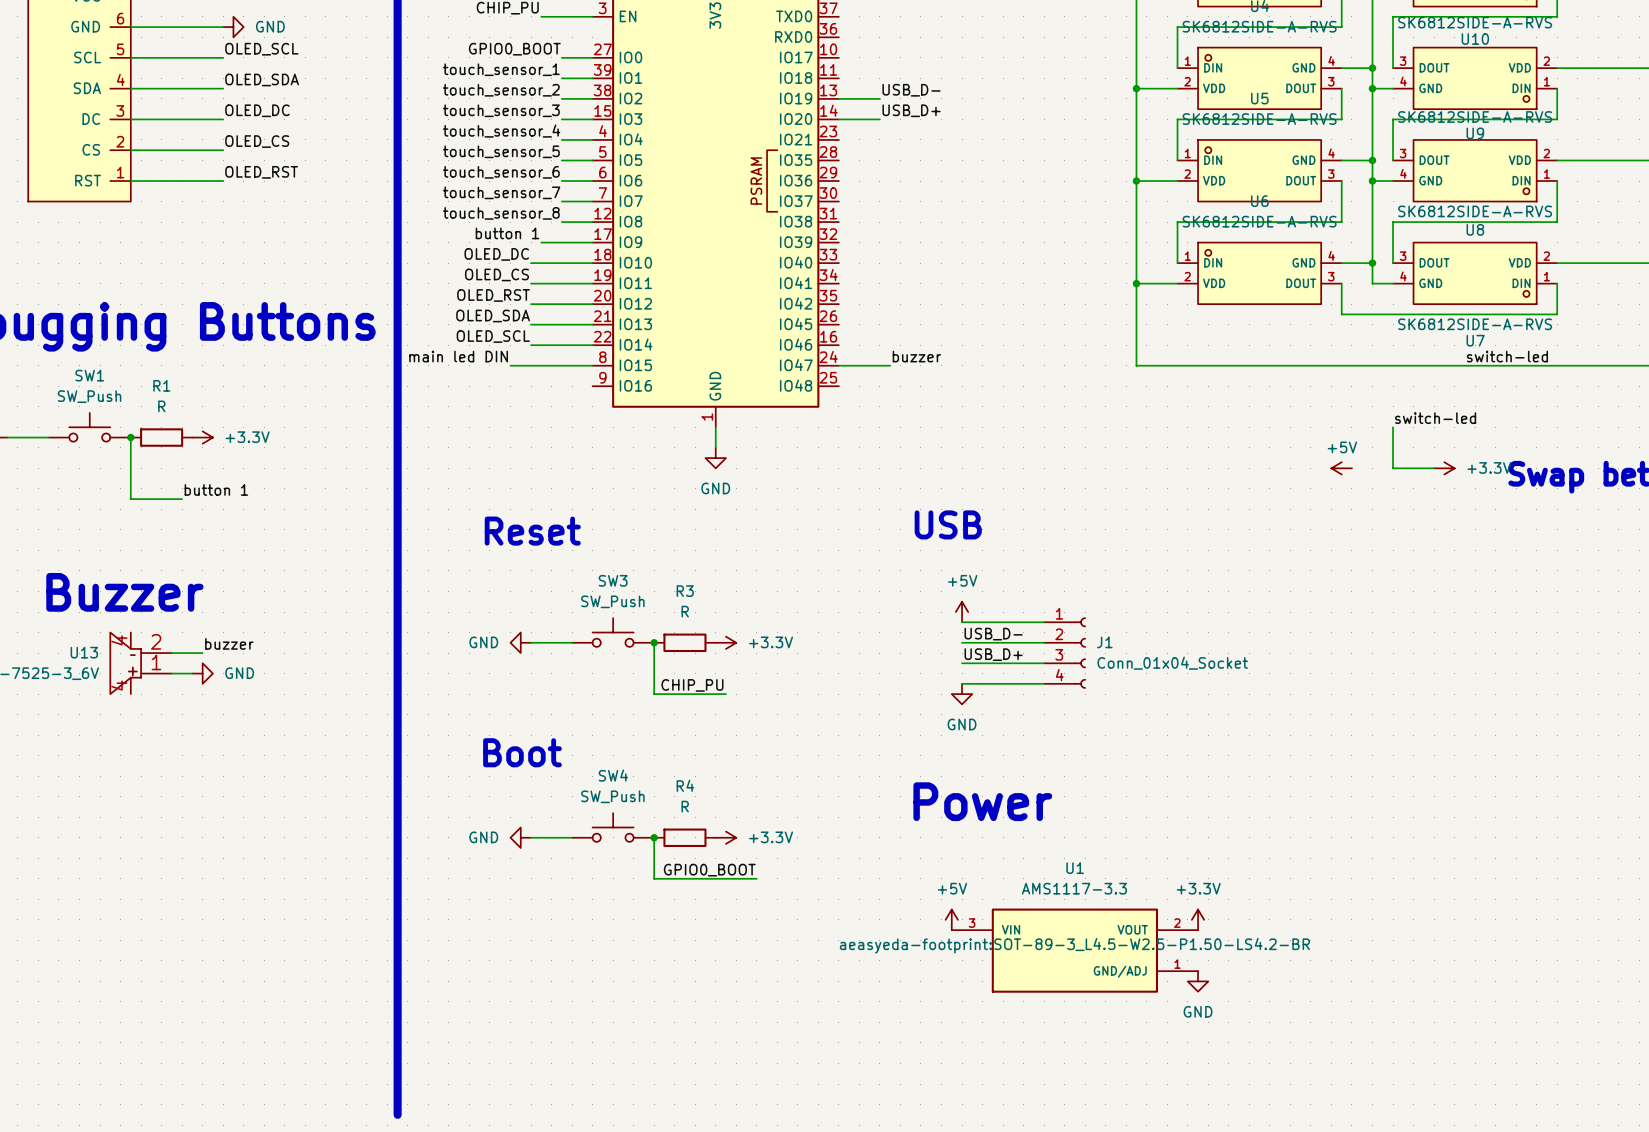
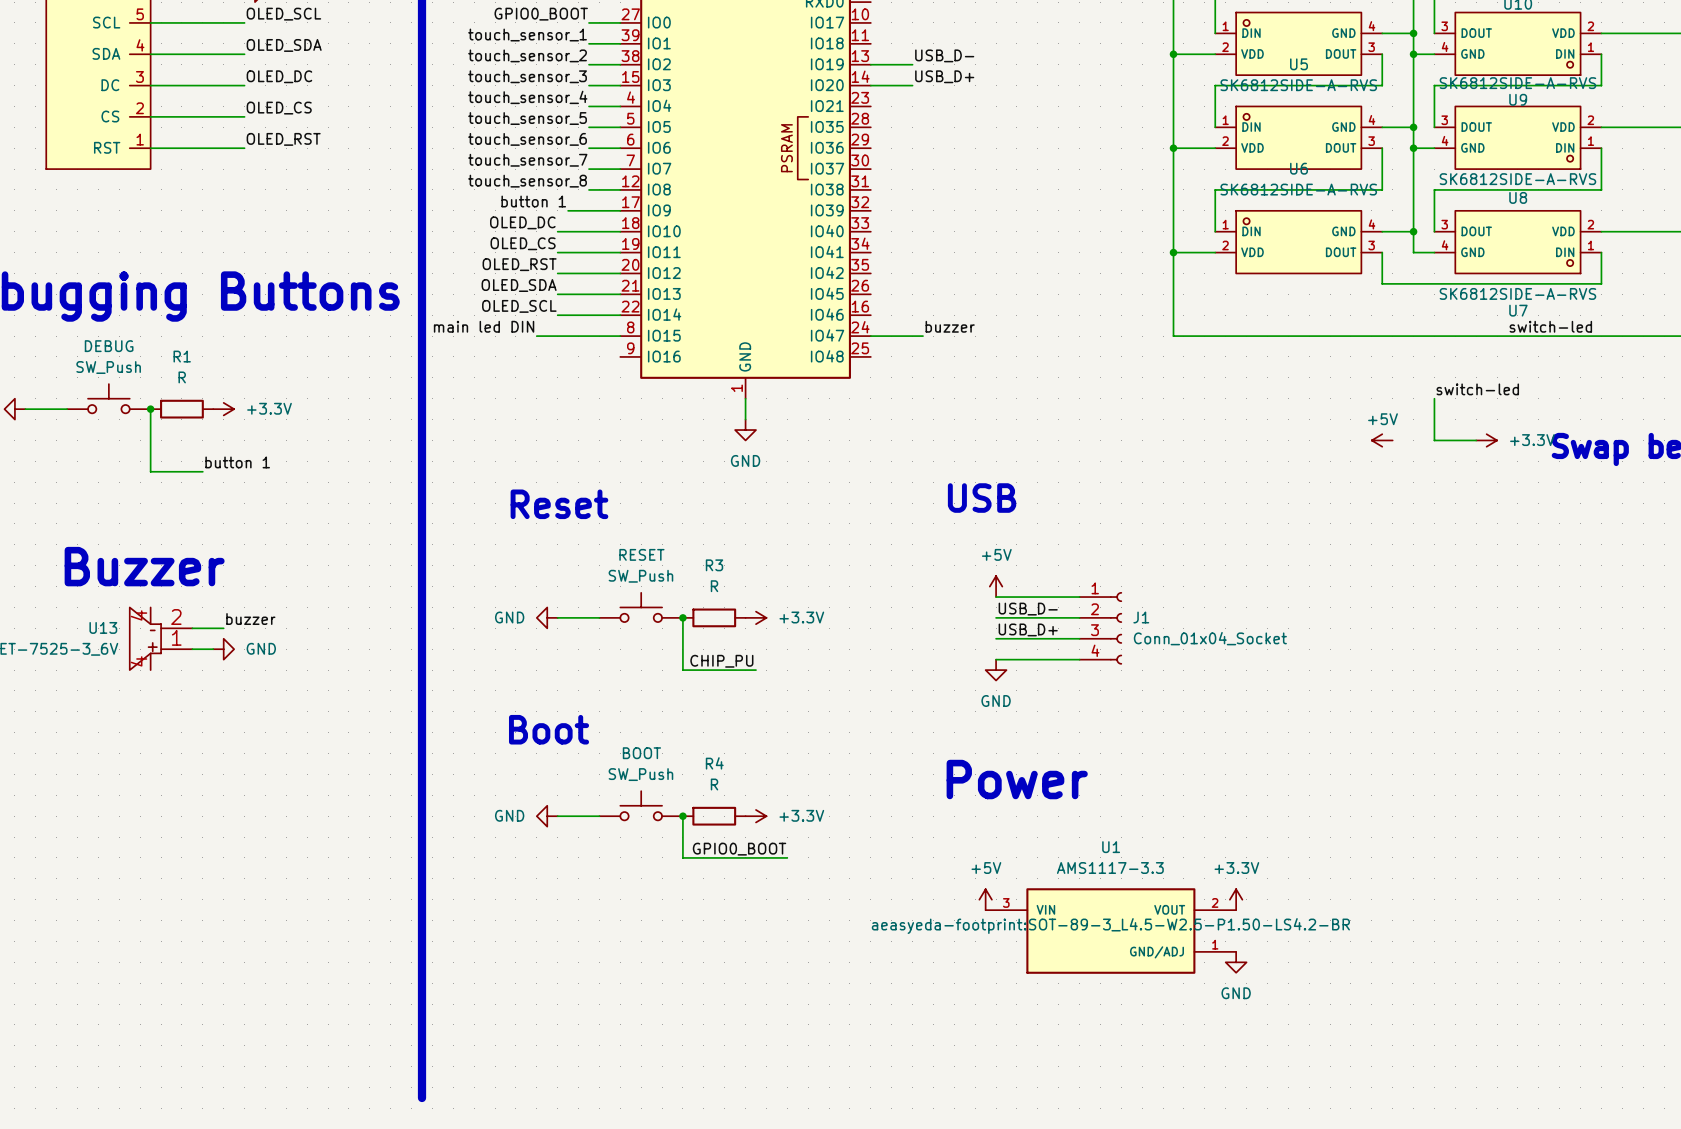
SW1 name: SW1 (89, 375) -> DEBUG (109, 346)
SW3 name: SW3 (613, 580) -> RESET (641, 554)
SW4 name: SW4 (613, 775) -> BOOT (641, 753)

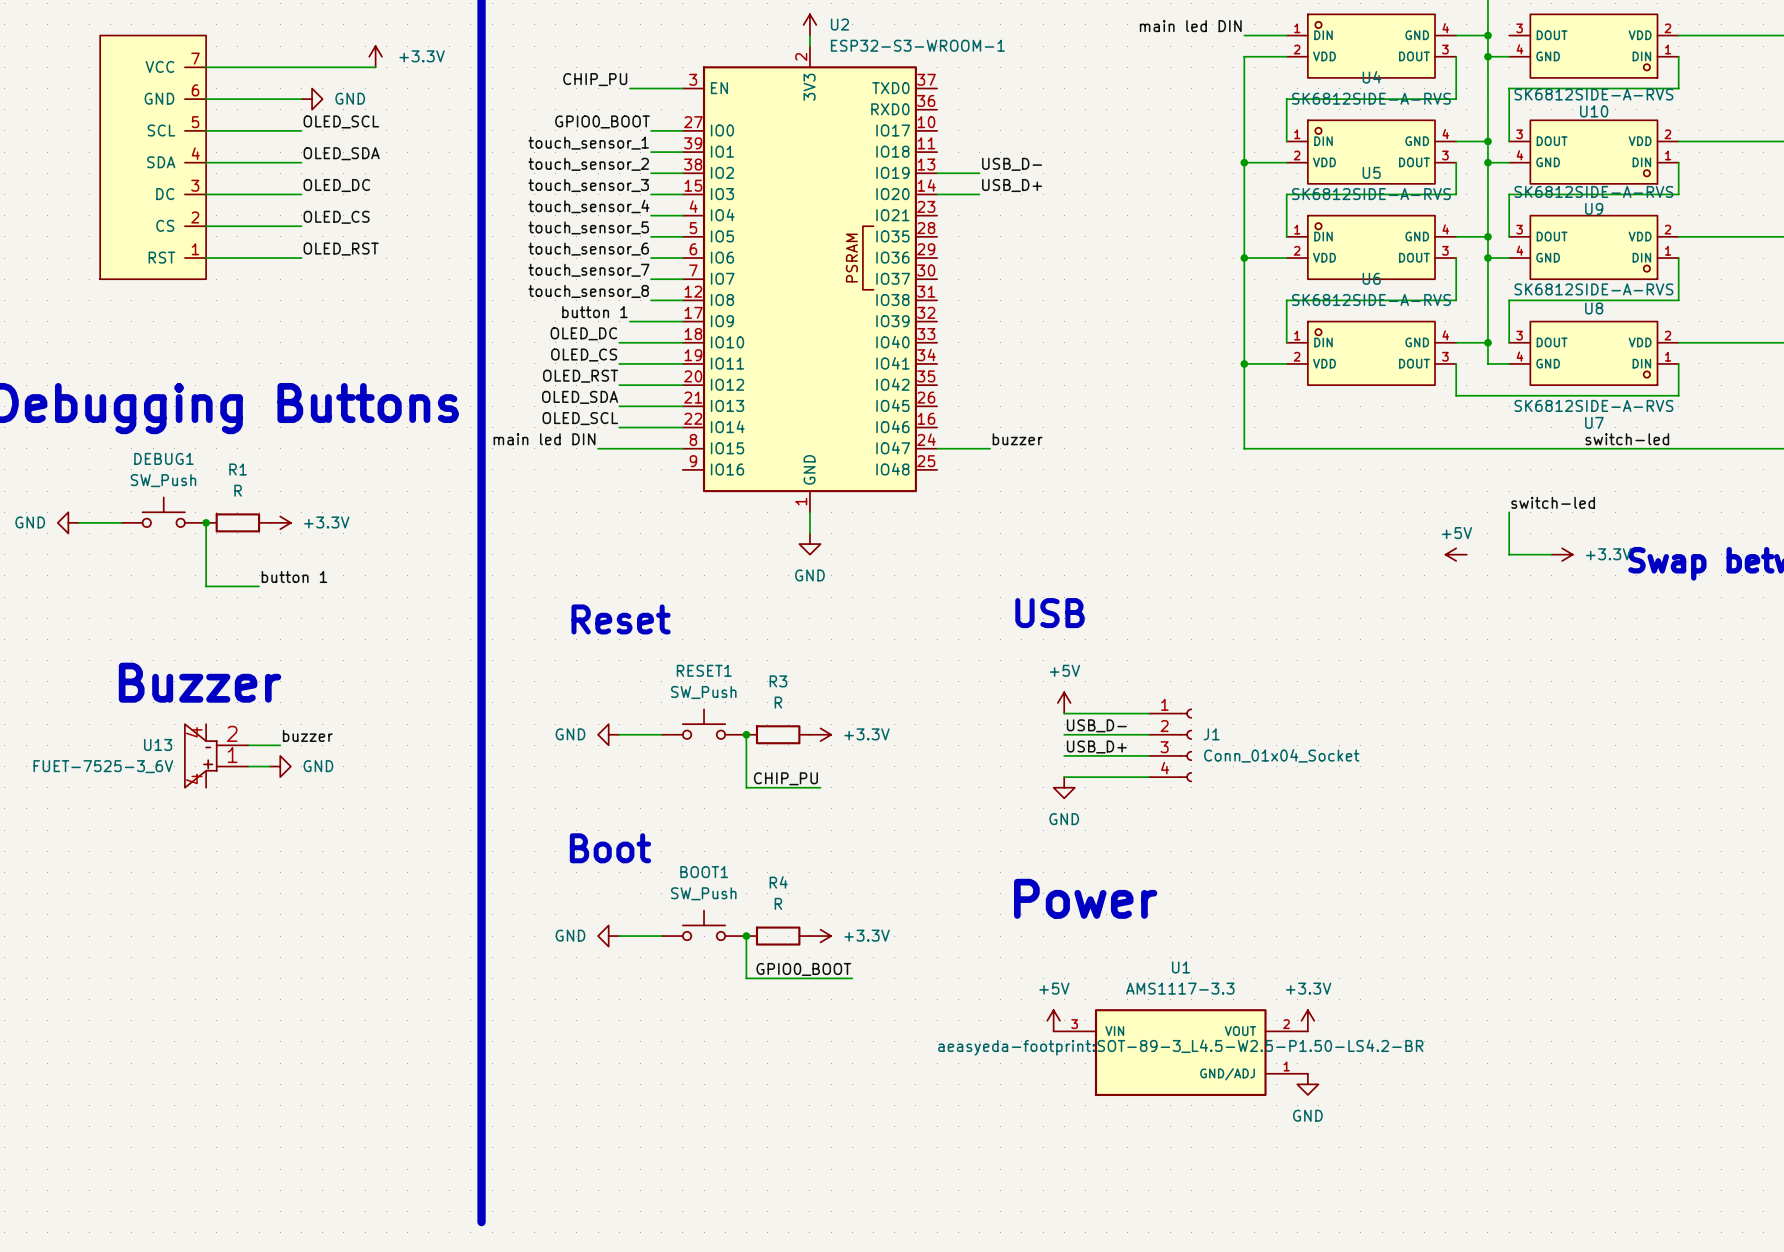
DEBUG name: DEBUG (109, 346) -> DEBUG1 (163, 458)
RESET name: RESET (641, 554) -> RESET1 (704, 670)
BOOT name: BOOT (641, 753) -> BOOT1 (704, 872)

